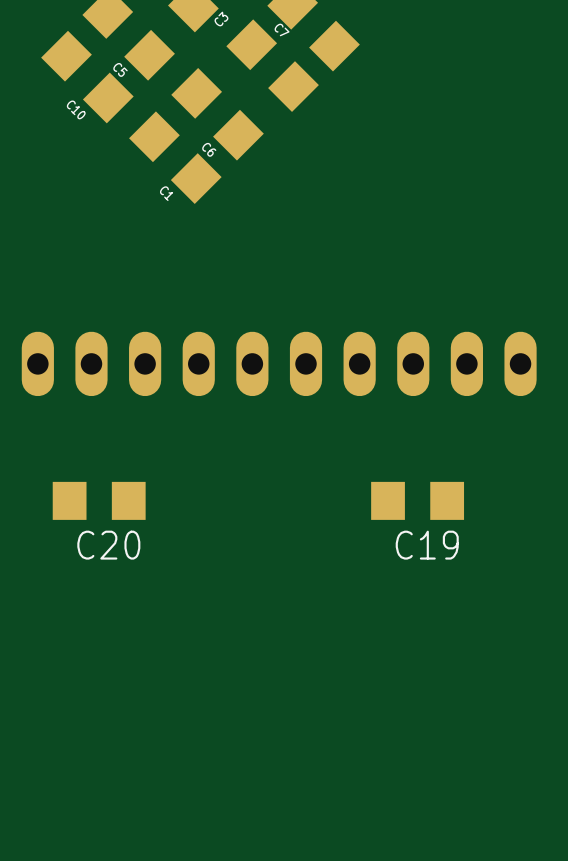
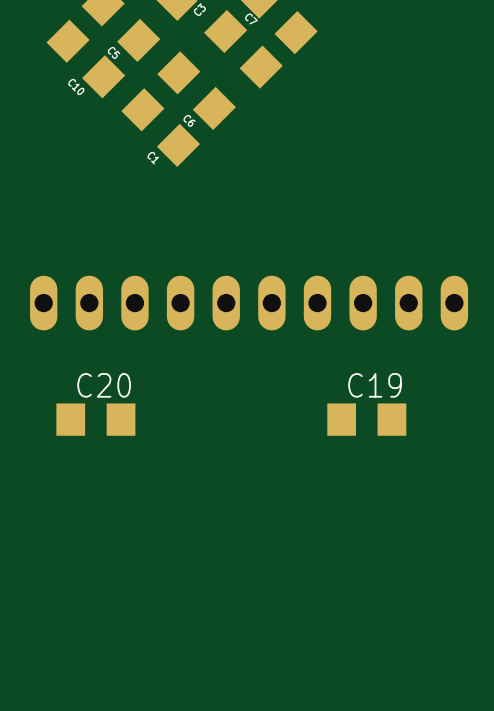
C20 name position: C20 (108, 545) -> C20 (104, 385)
C19 name position: C19 (427, 545) -> C19 (375, 385)

